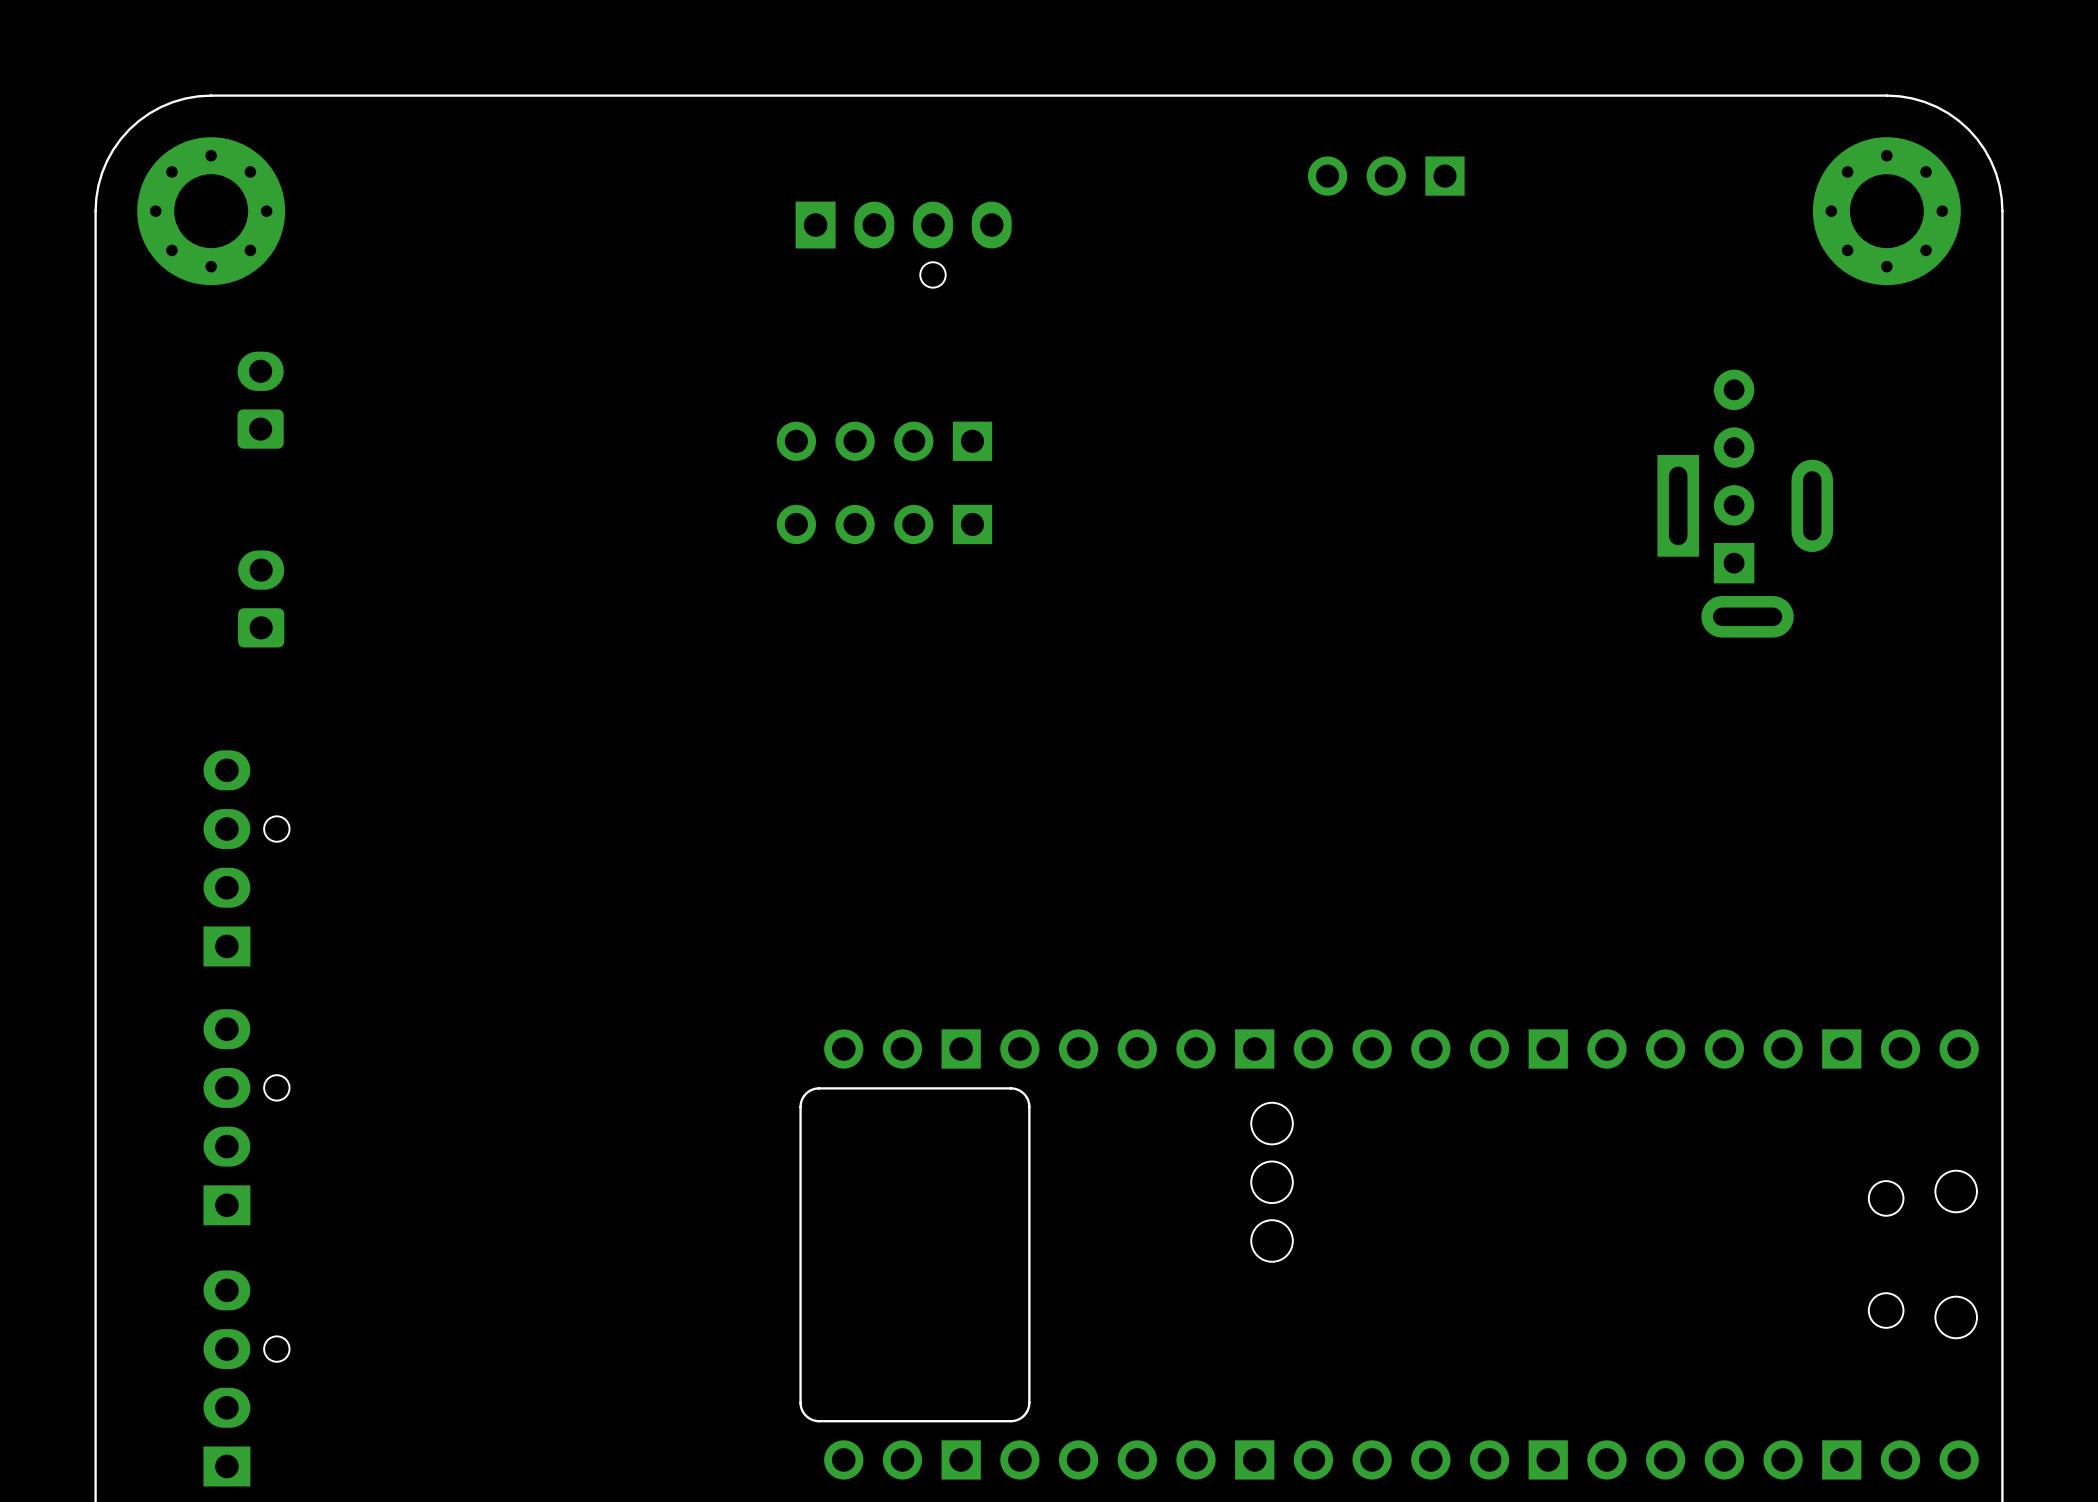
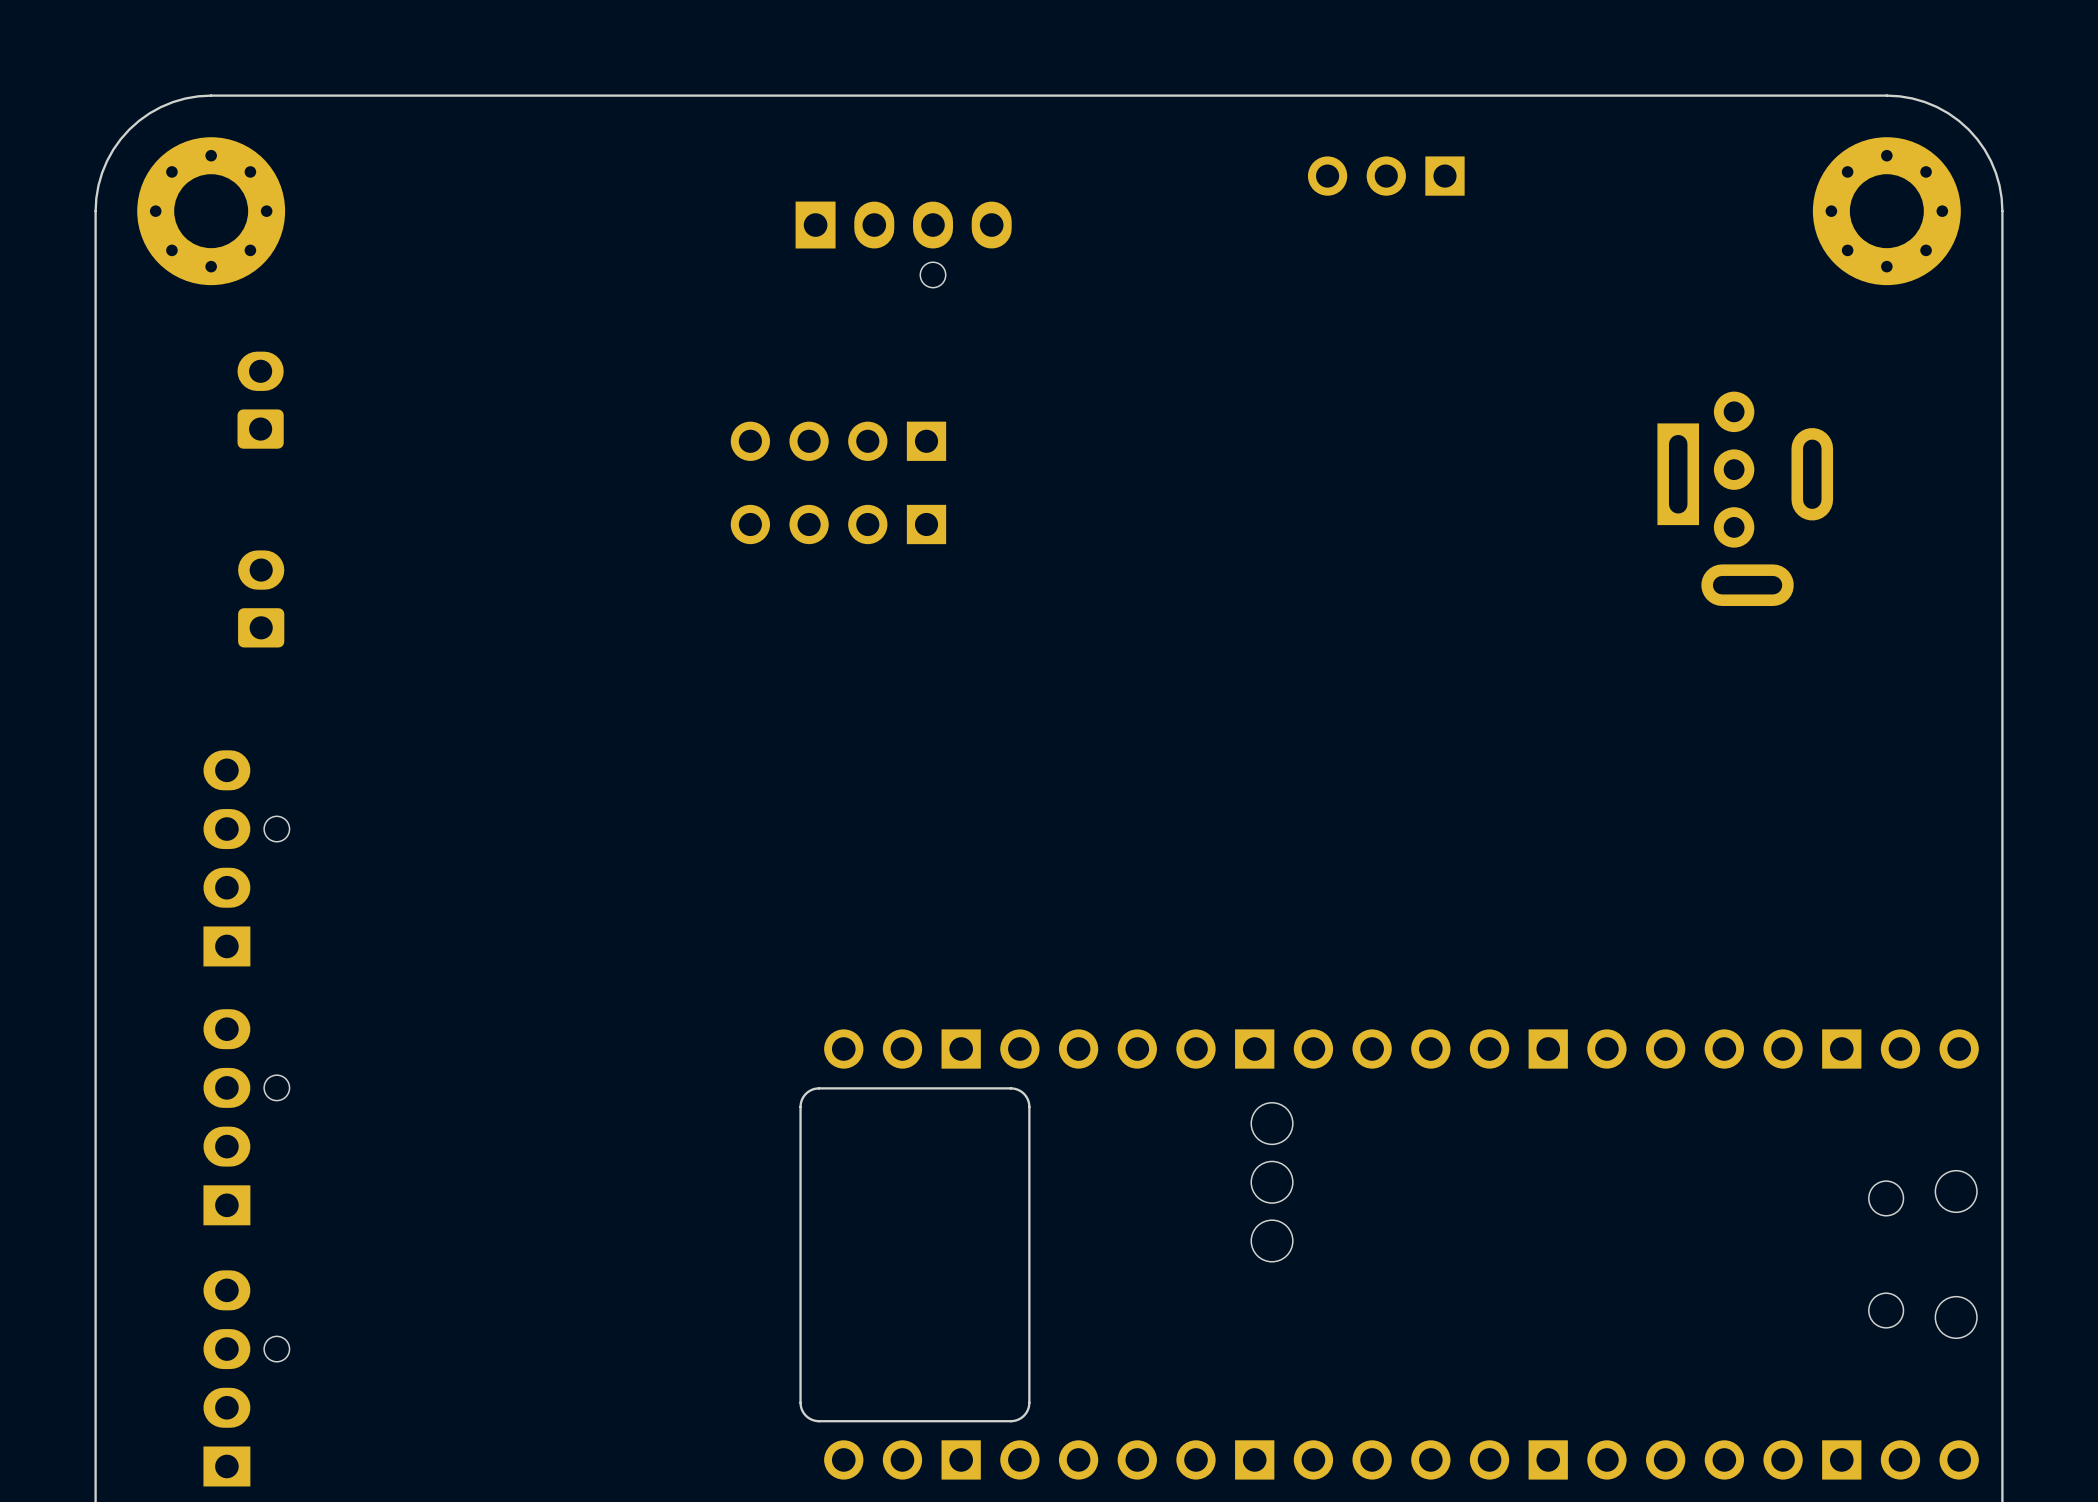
part footprint: [1657, 369, 1834, 638] -> [1657, 391, 1834, 606]
part position: (884, 441) -> (838, 441)
part position: (884, 524) -> (838, 524)

